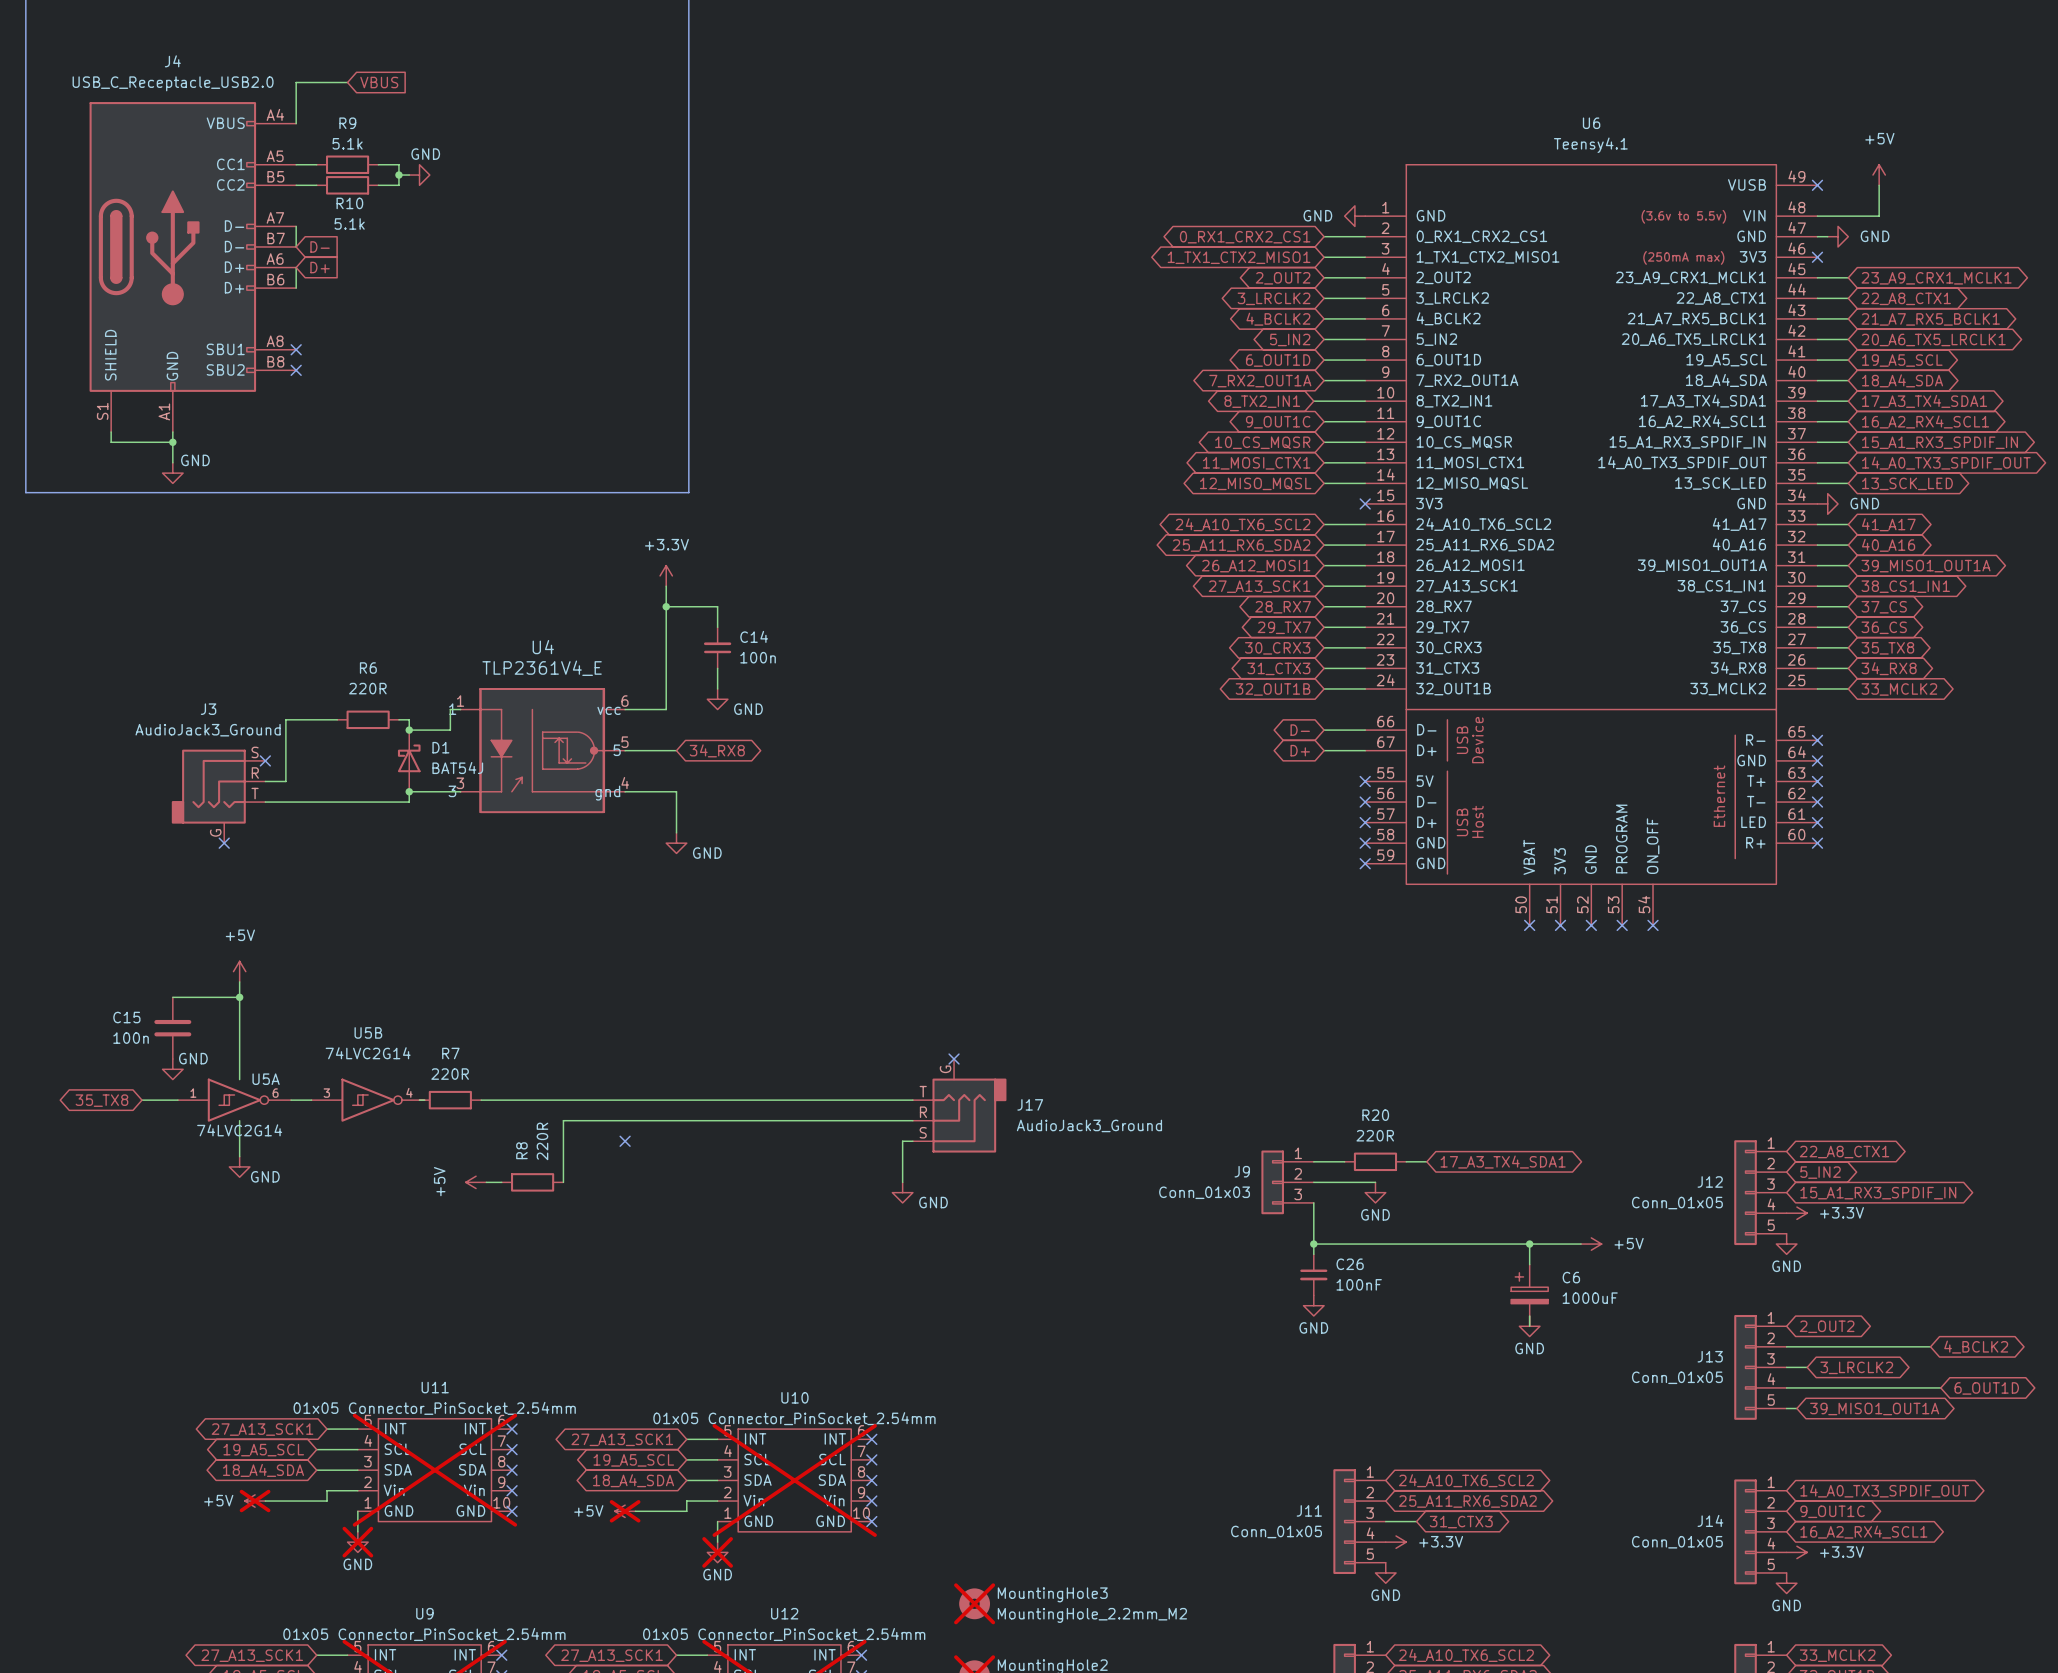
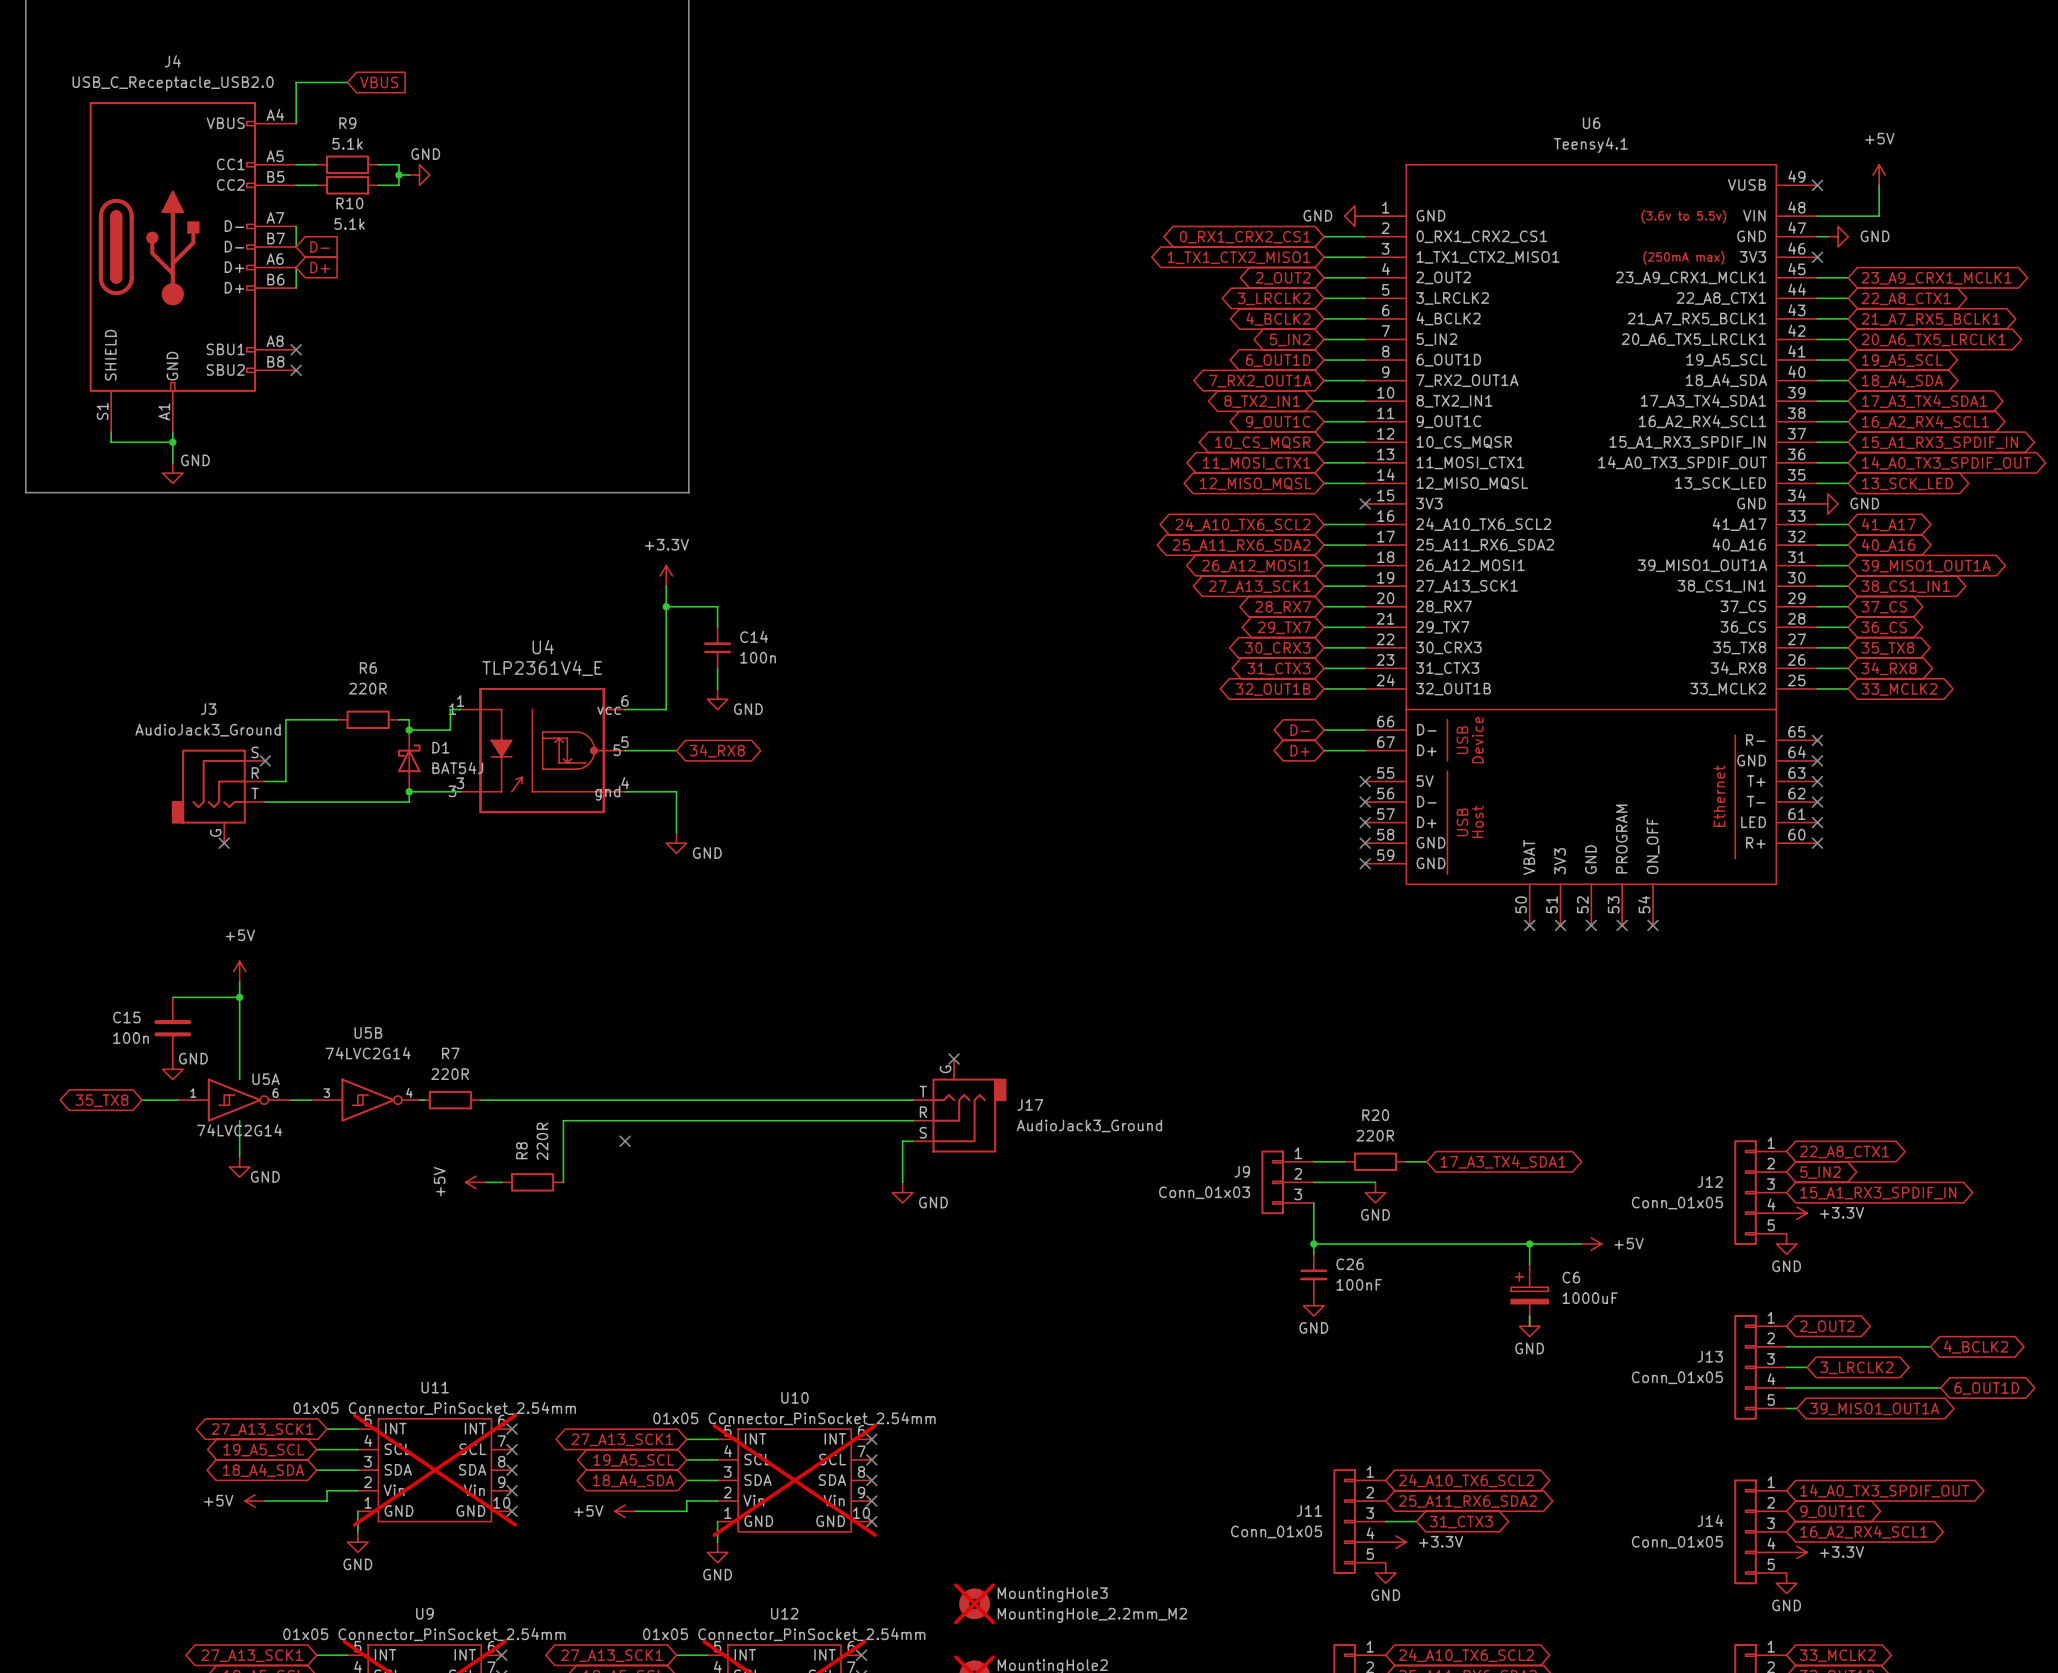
power symbol do-not-place cross: (255, 1501) -> none
power symbol do-not-place cross: (625, 1511) -> none
power symbol do-not-place cross: (357, 1542) -> none
power symbol do-not-place cross: (717, 1552) -> none

